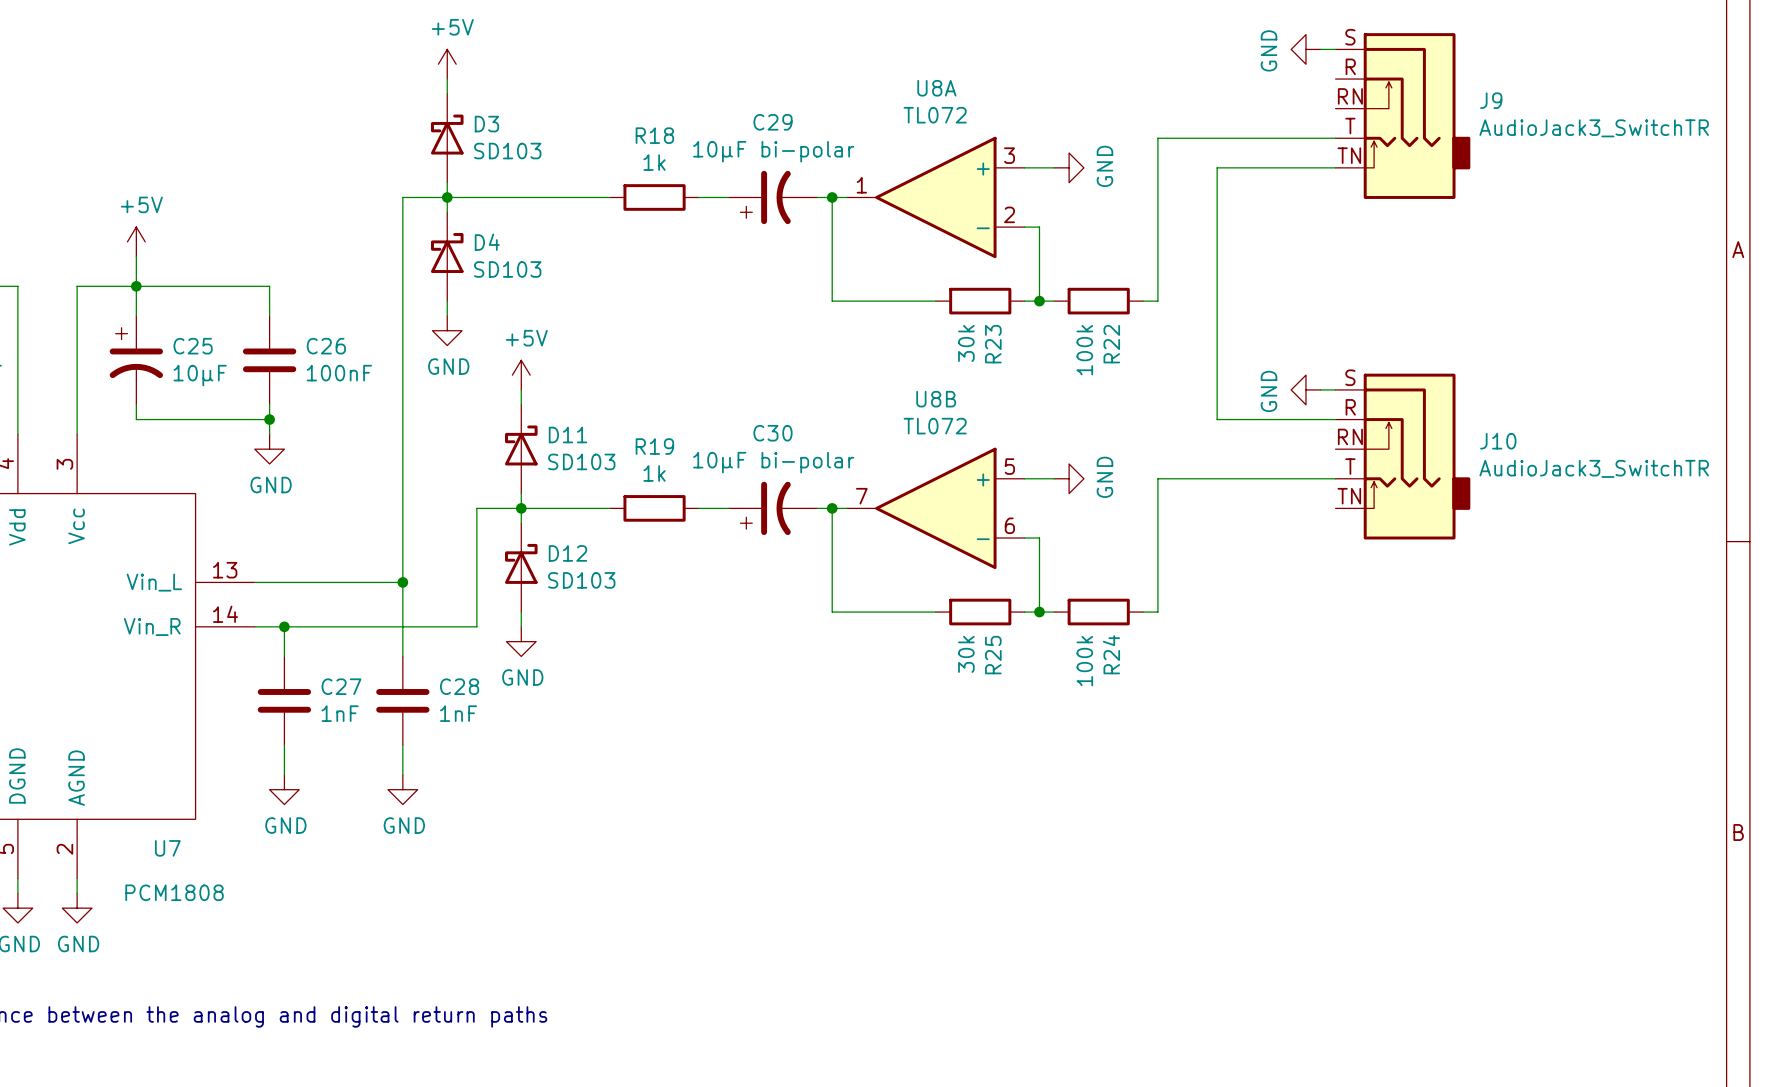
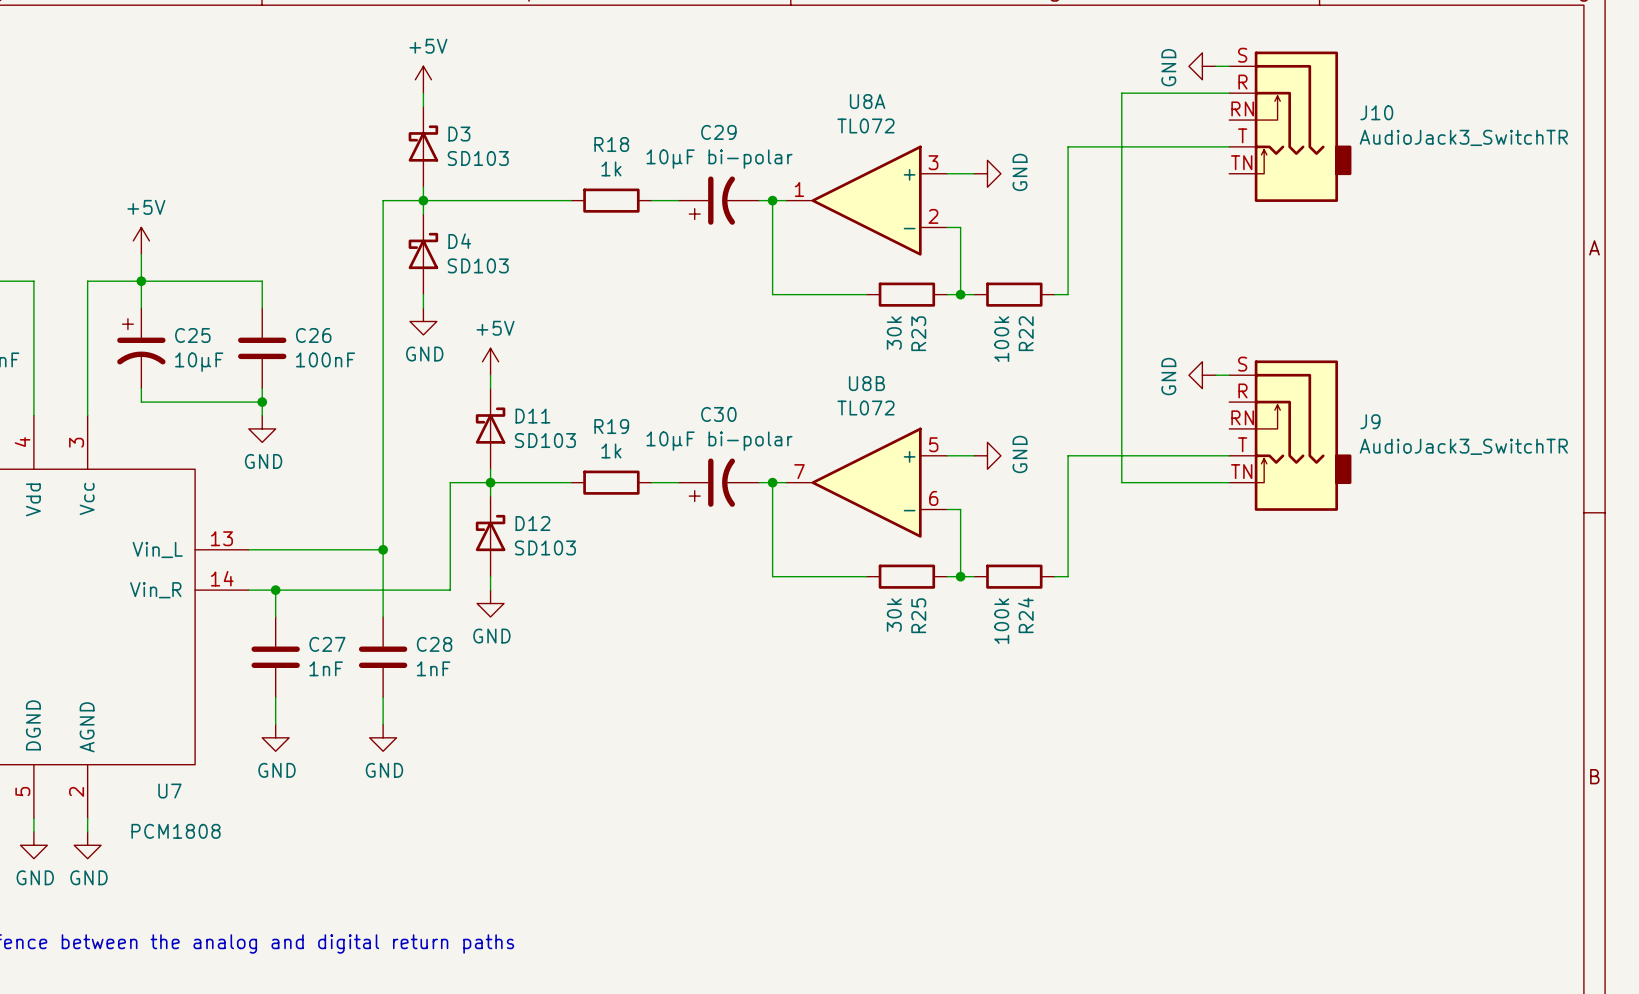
J9 name: J9 (1491, 100) -> J10 (1376, 112)
wire: (1217, 167) (1335, 167) -> (1121, 173) (1121, 93) (1229, 93)
wire: (1217, 419) (1335, 419) -> (1121, 402) (1121, 482) (1229, 482)
J10 name: J10 (1498, 441) -> J9 (1370, 421)

